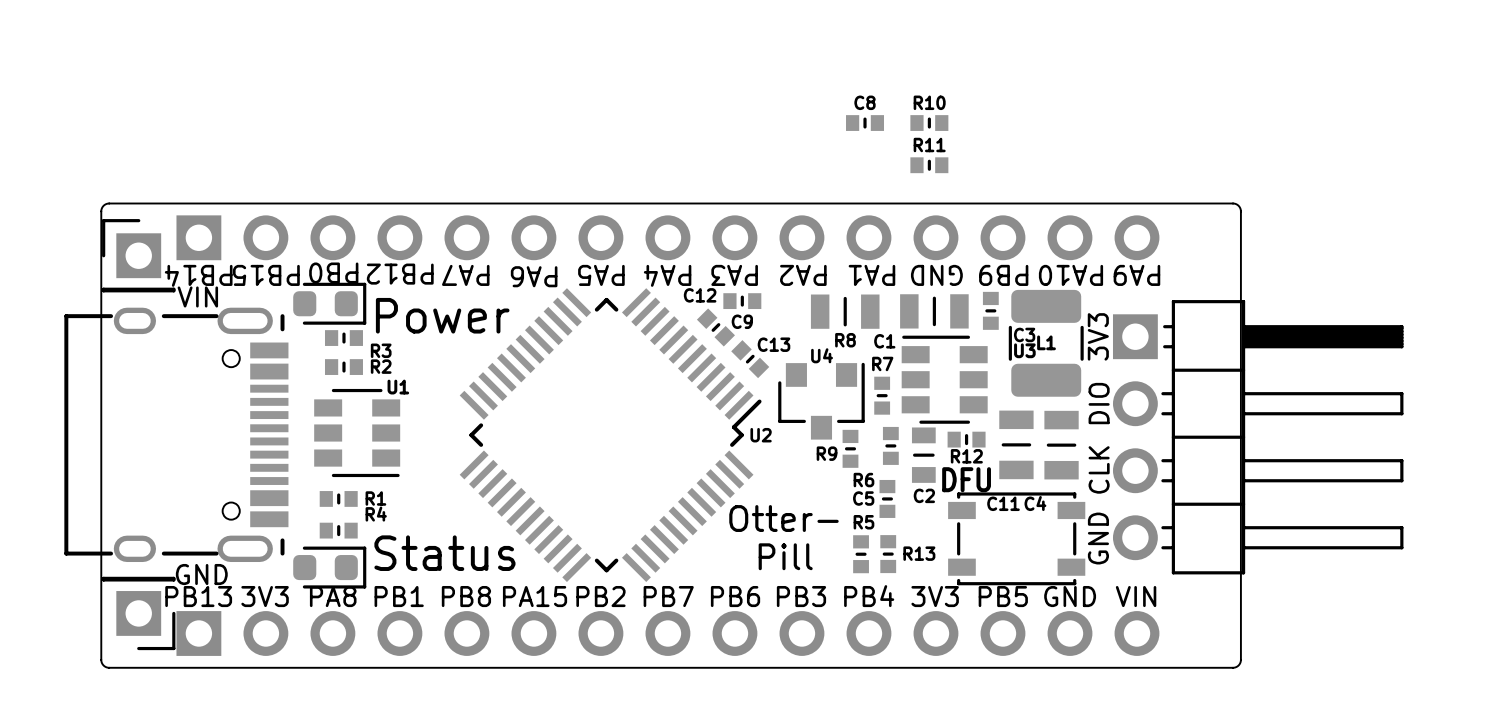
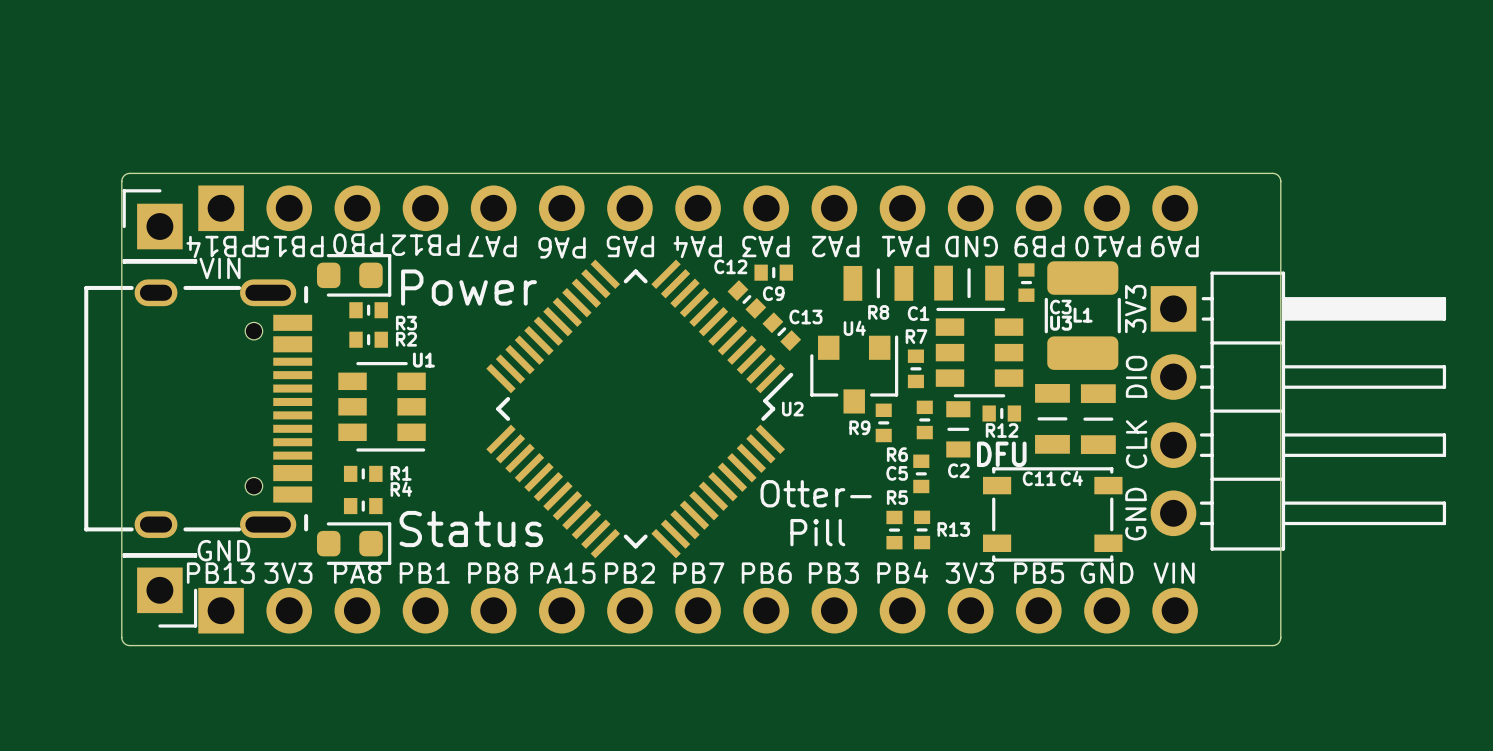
C8: (865, 123) -> none
R10: (929, 123) -> none
R11: (929, 165) -> none

